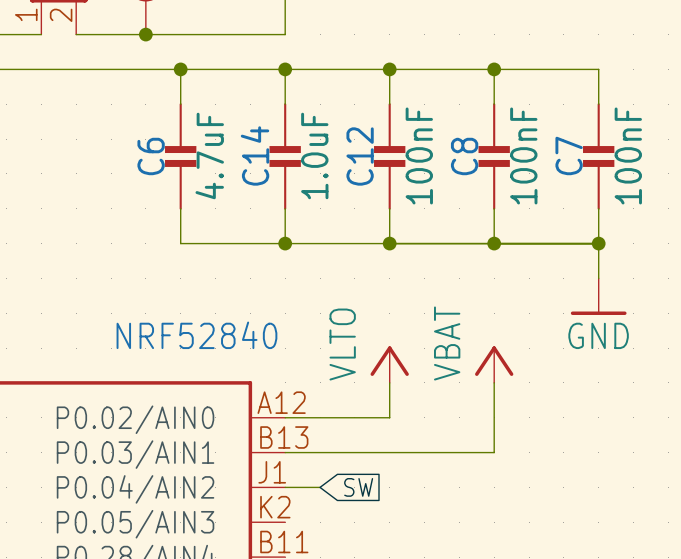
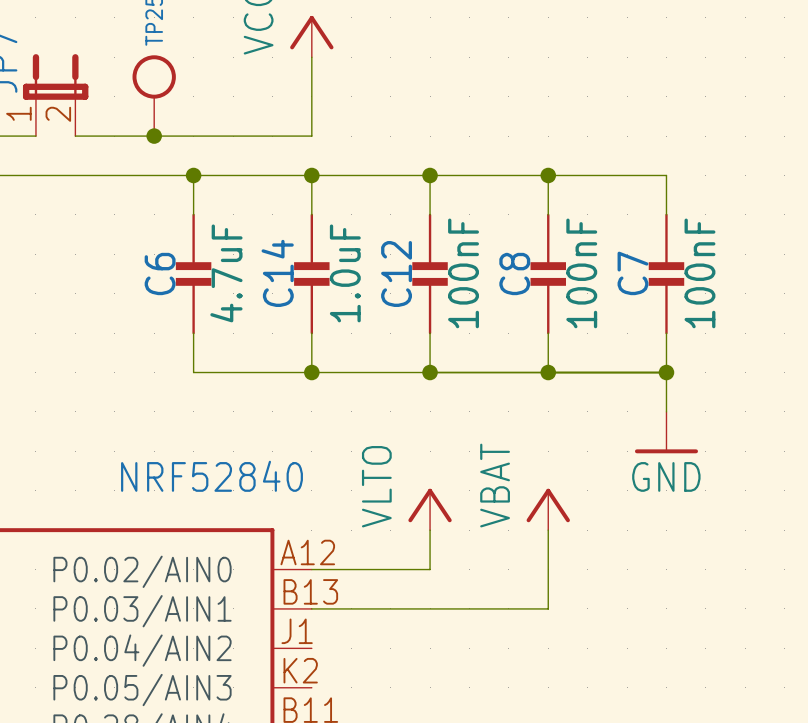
wire: (285, 487) (320, 487) -> none
global label: SW (358, 487) -> none

